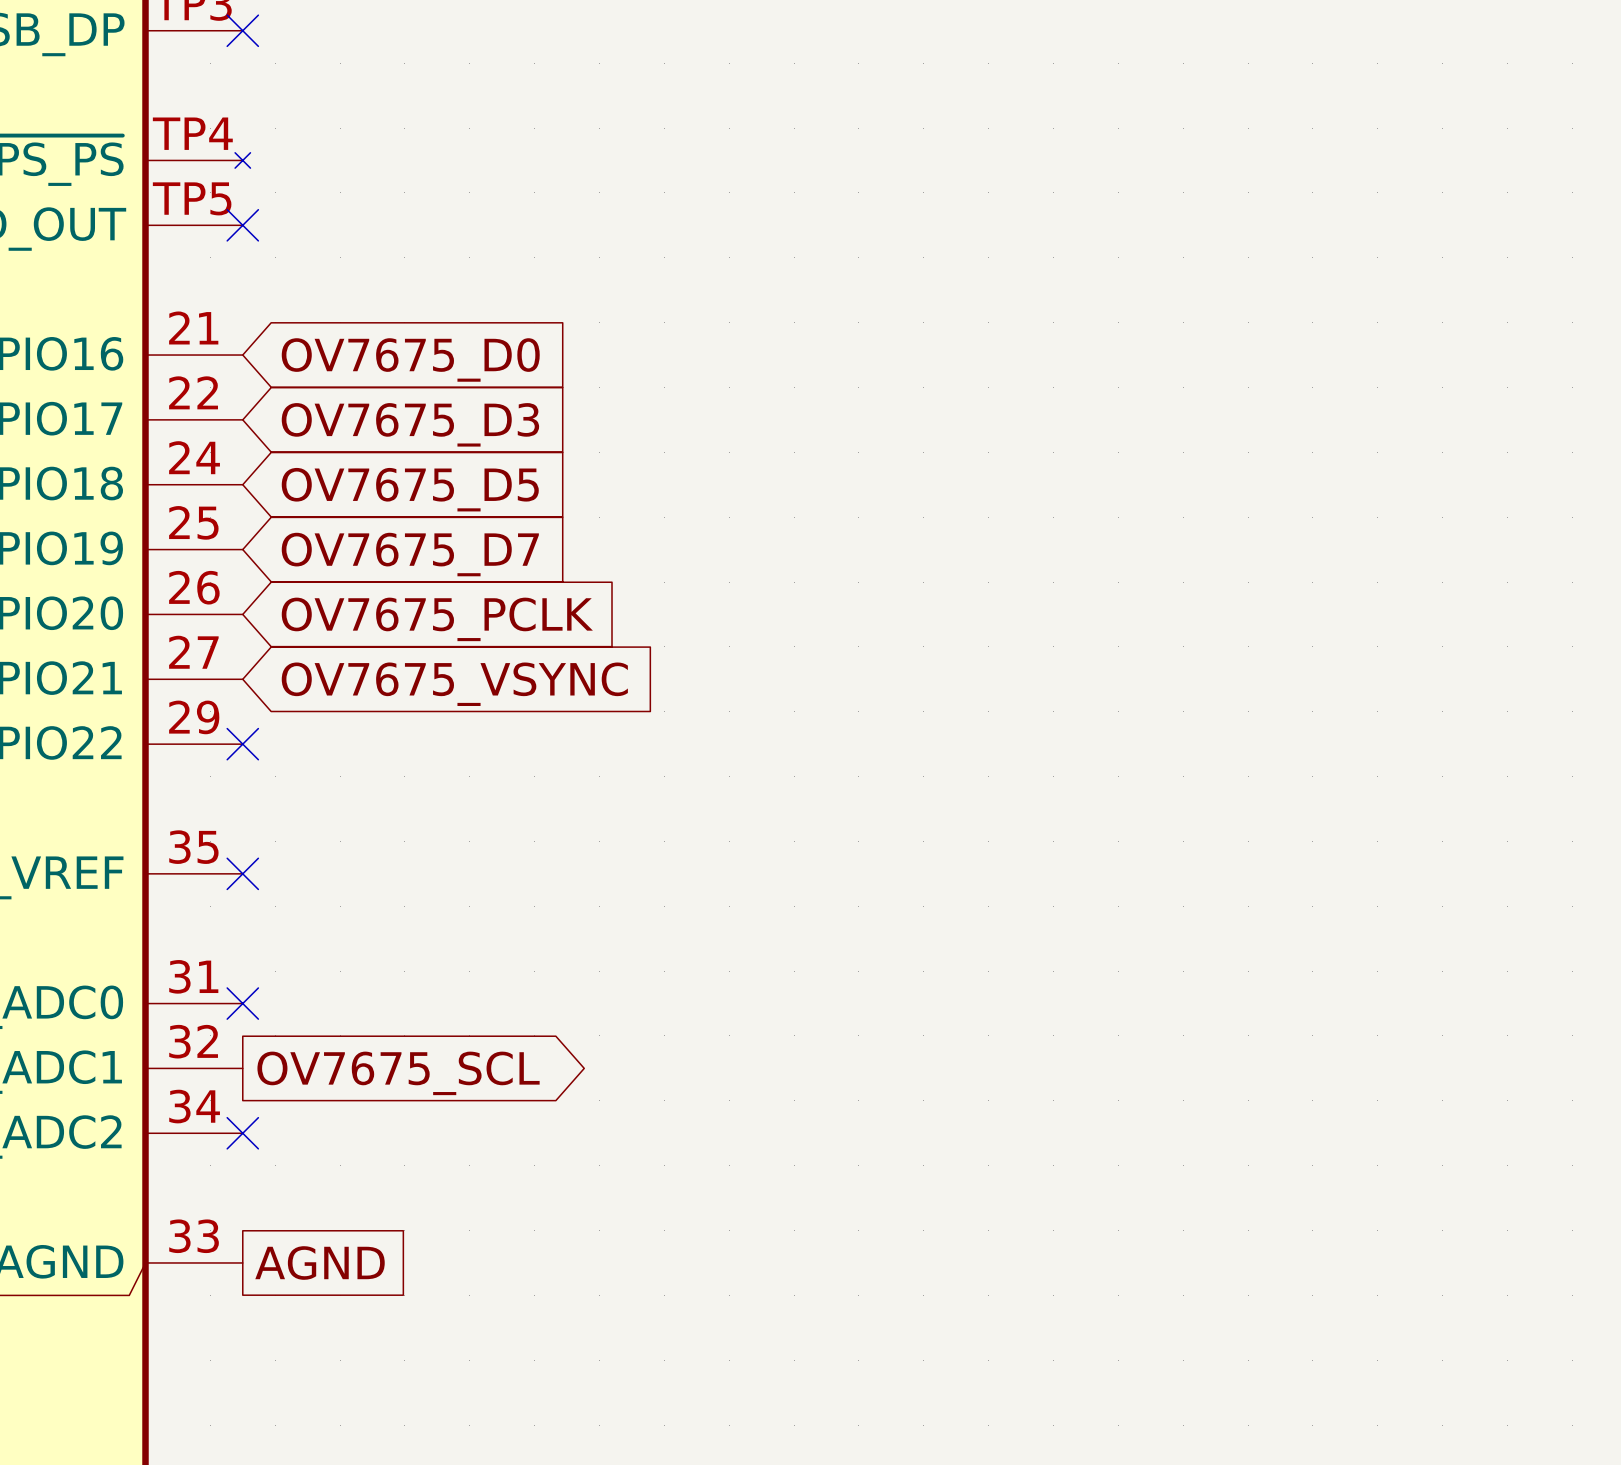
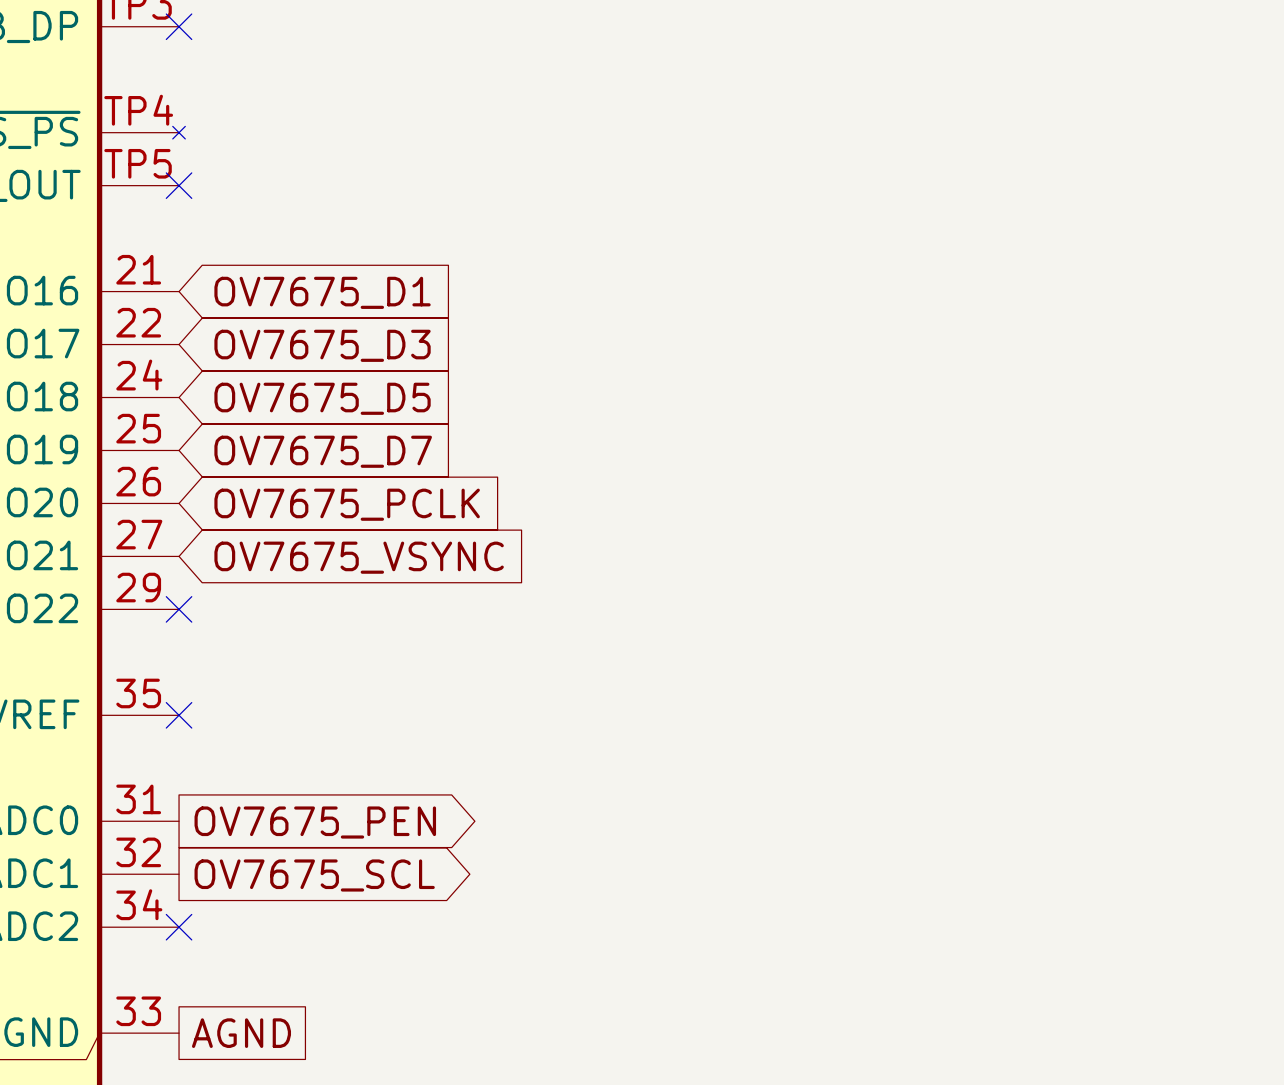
global label: OV7675_D0 (410, 359) -> OV7675_D1 (322, 292)
no-connect mark: (242, 1003) -> none
global label: none -> OV7675_PEN (315, 822)

